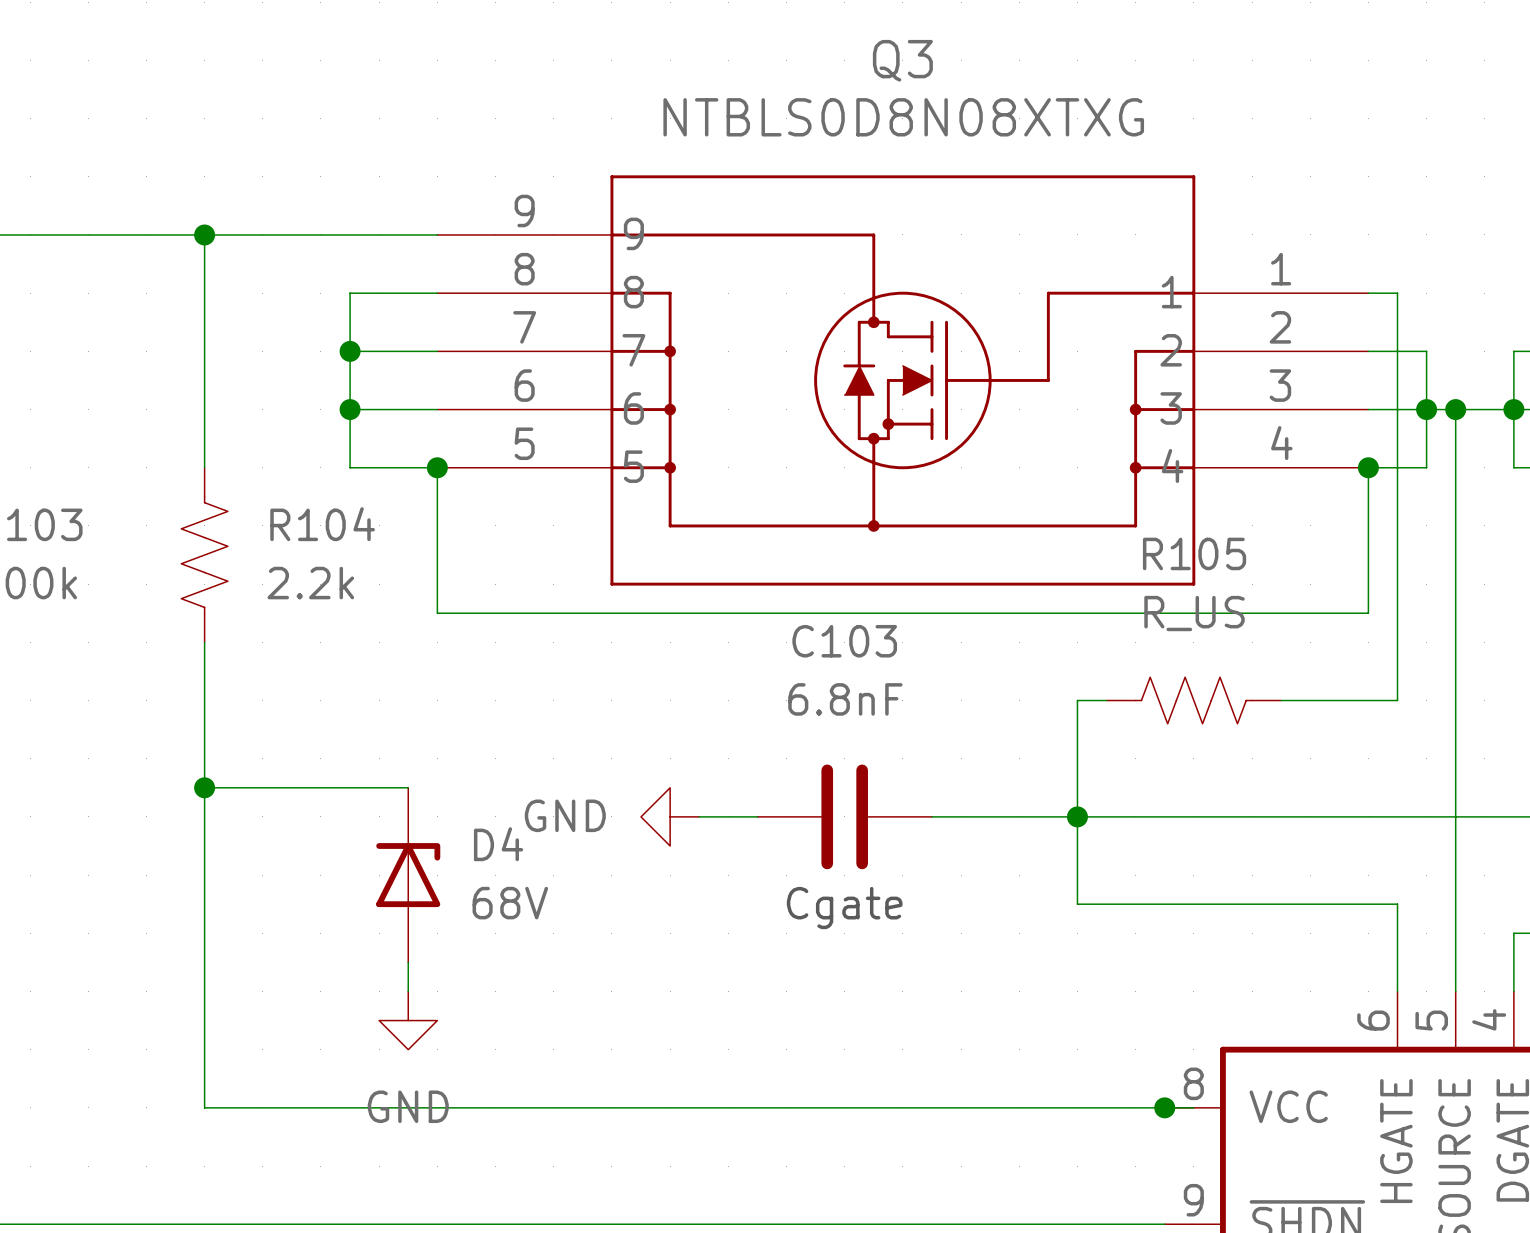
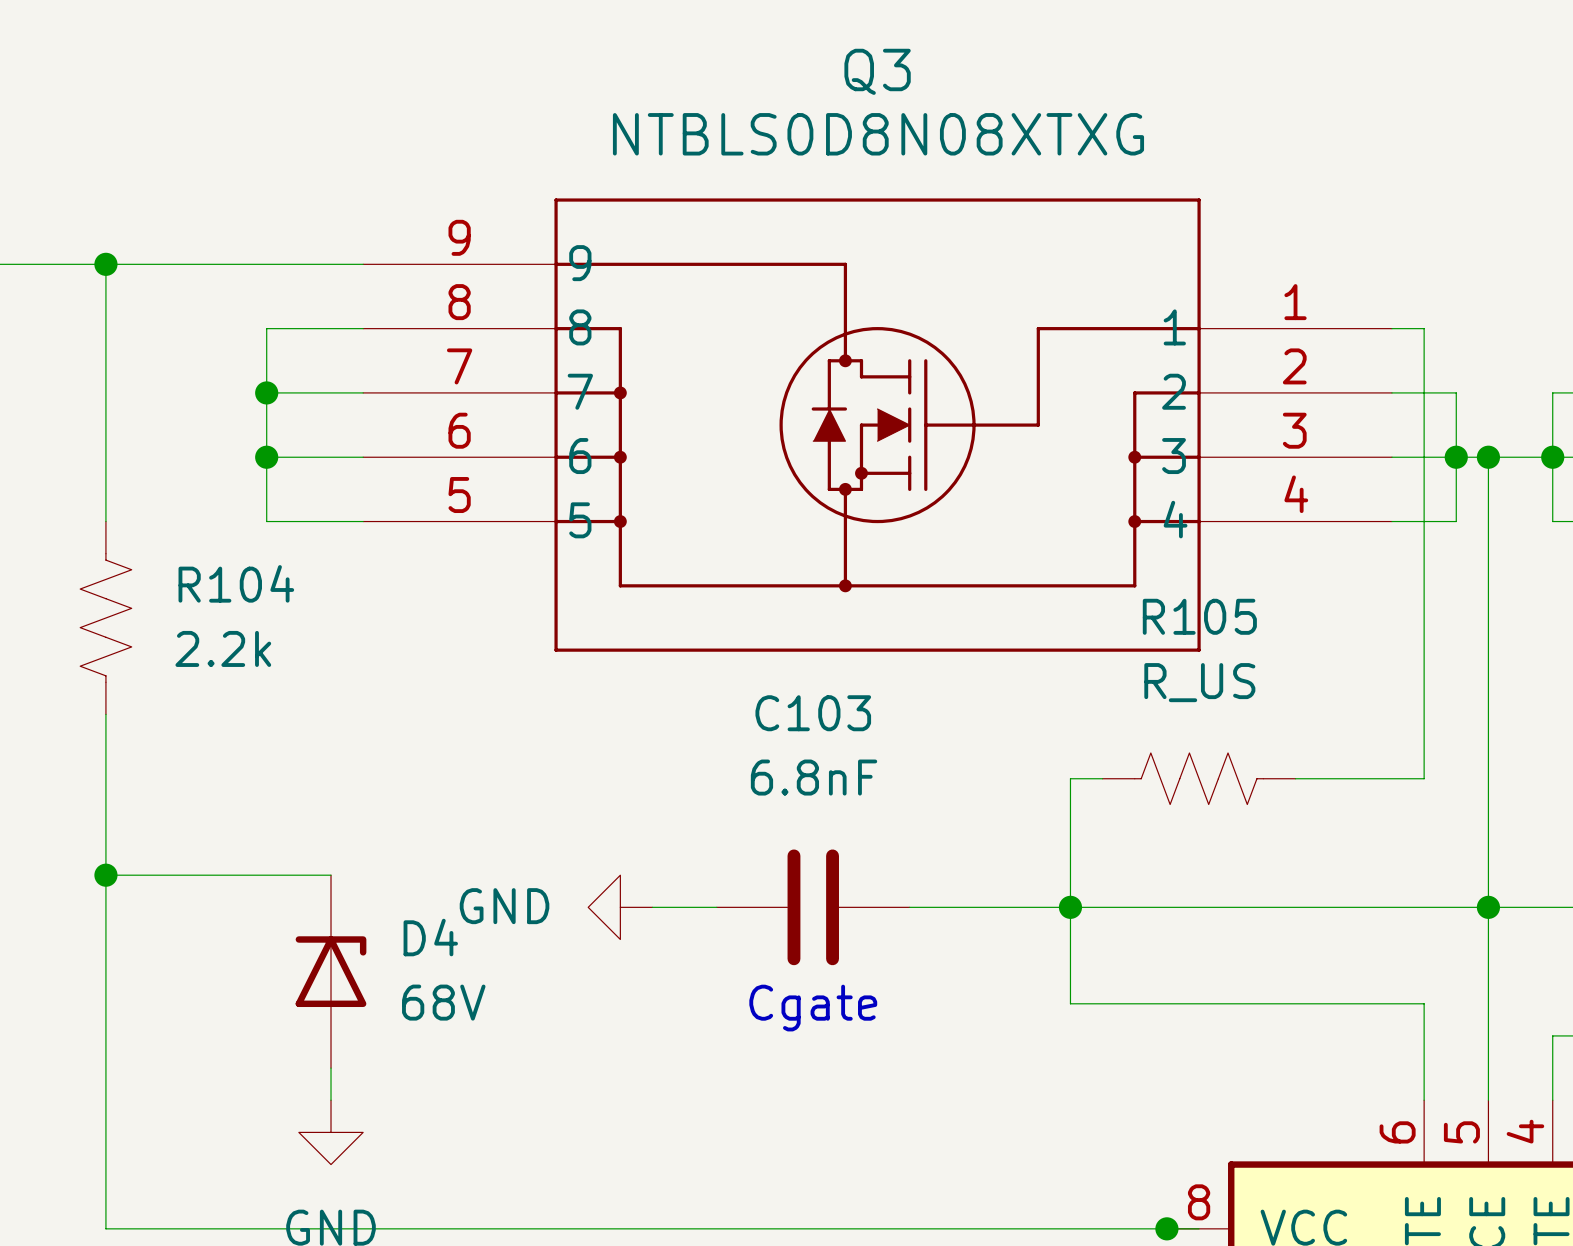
wire: (437, 467) (437, 613) (1368, 613) (1368, 467) -> none
junction: (437, 467) -> none
junction: (1368, 467) -> none
junction: none -> (1488, 907)

